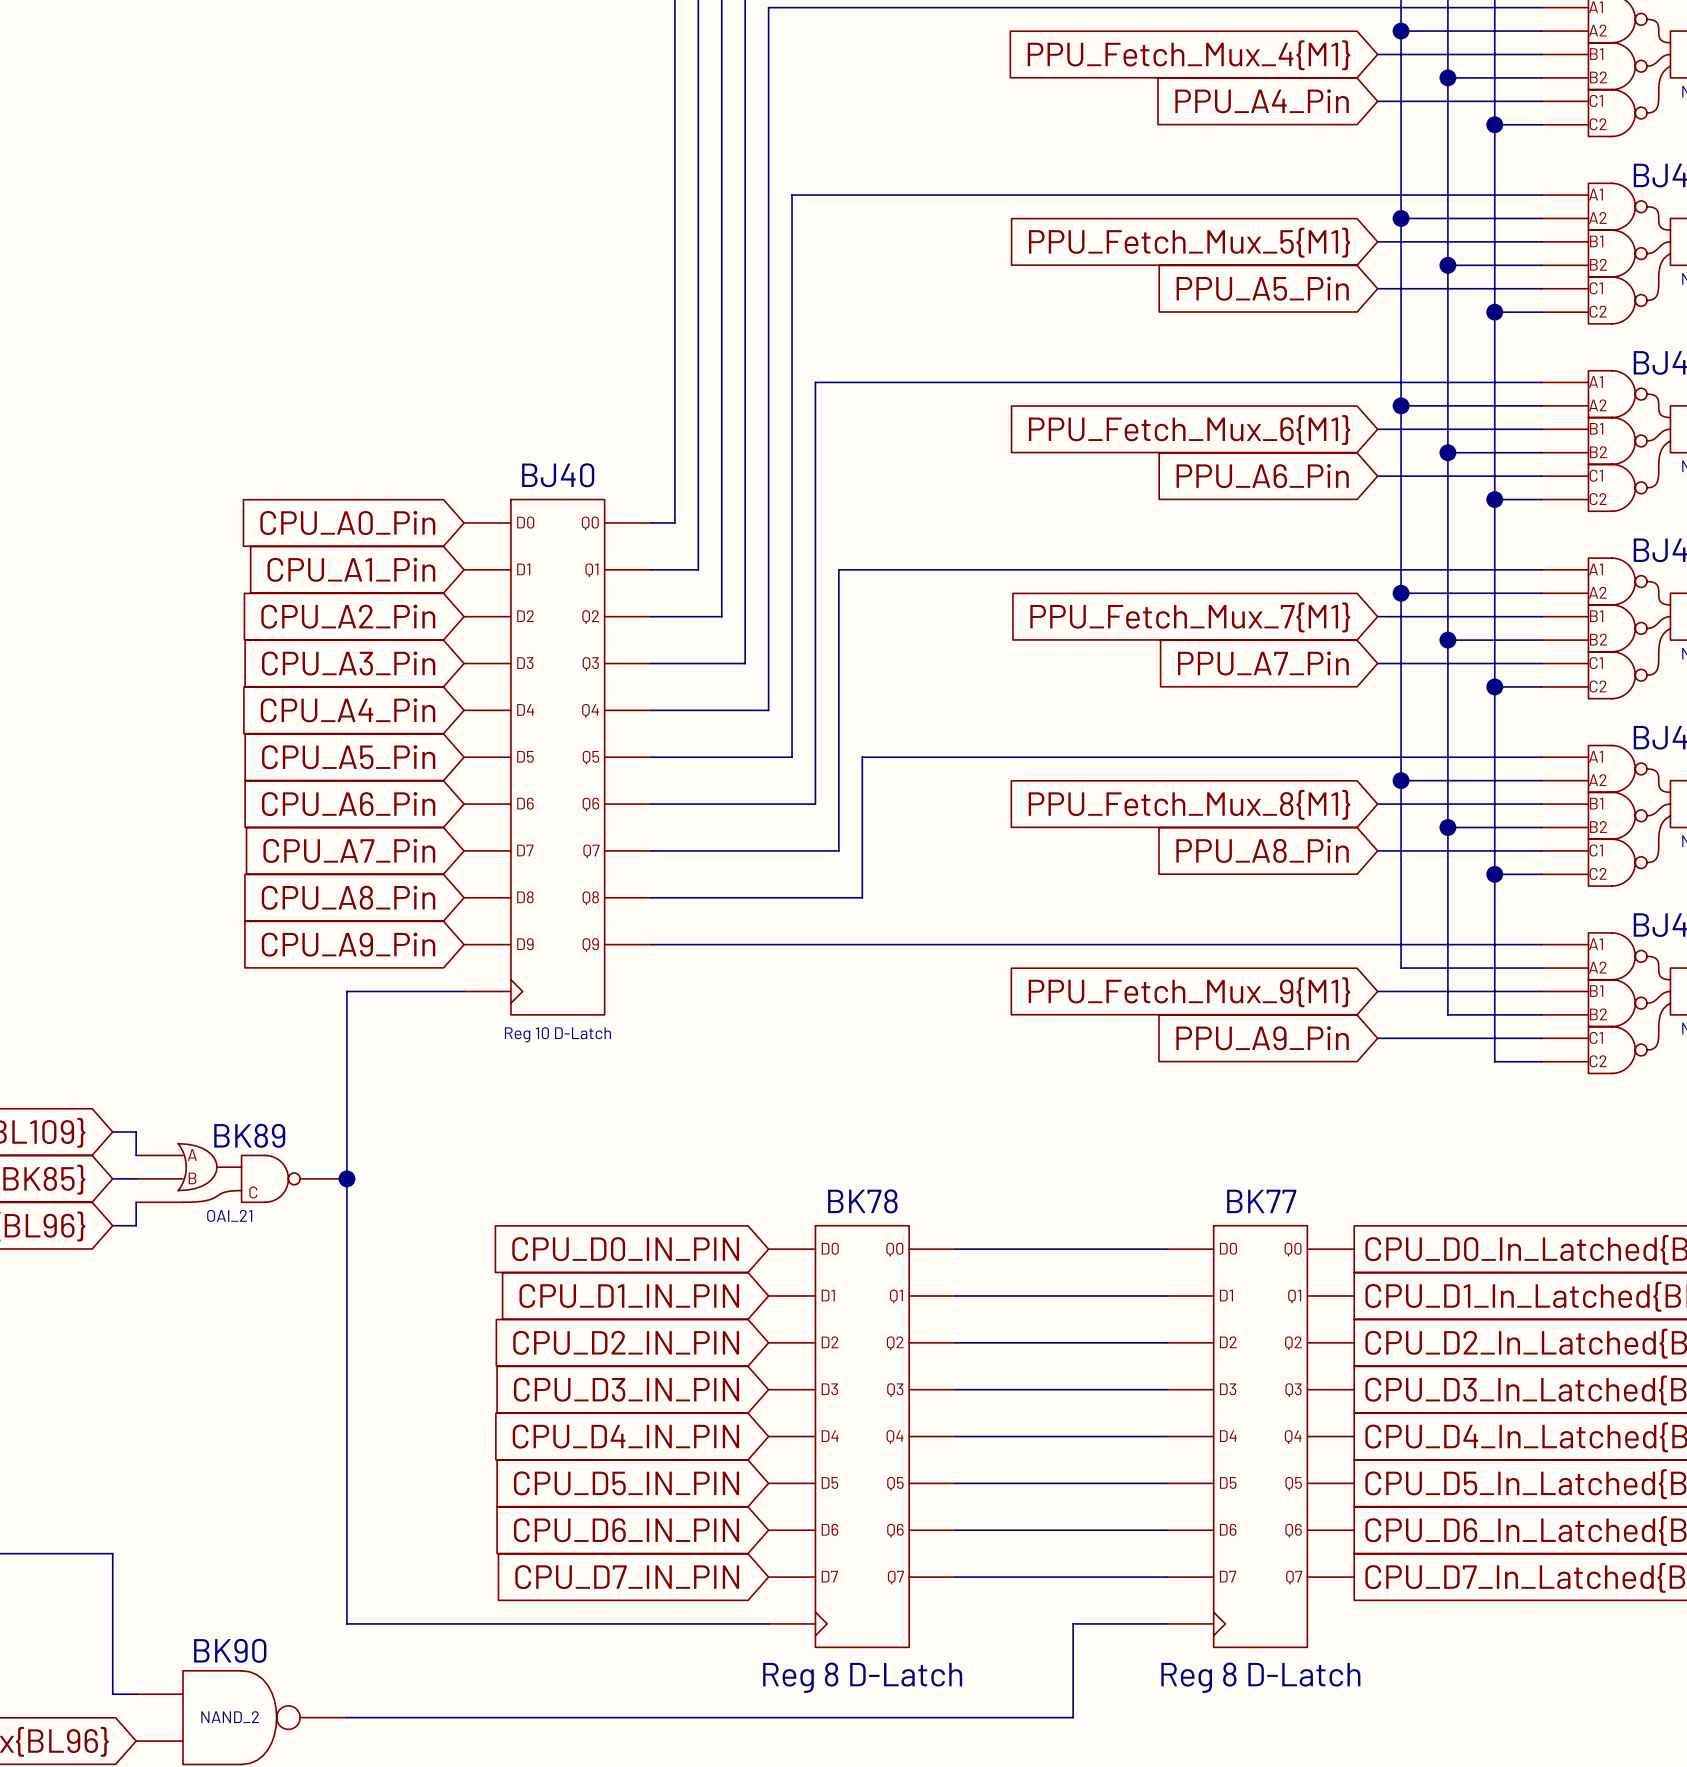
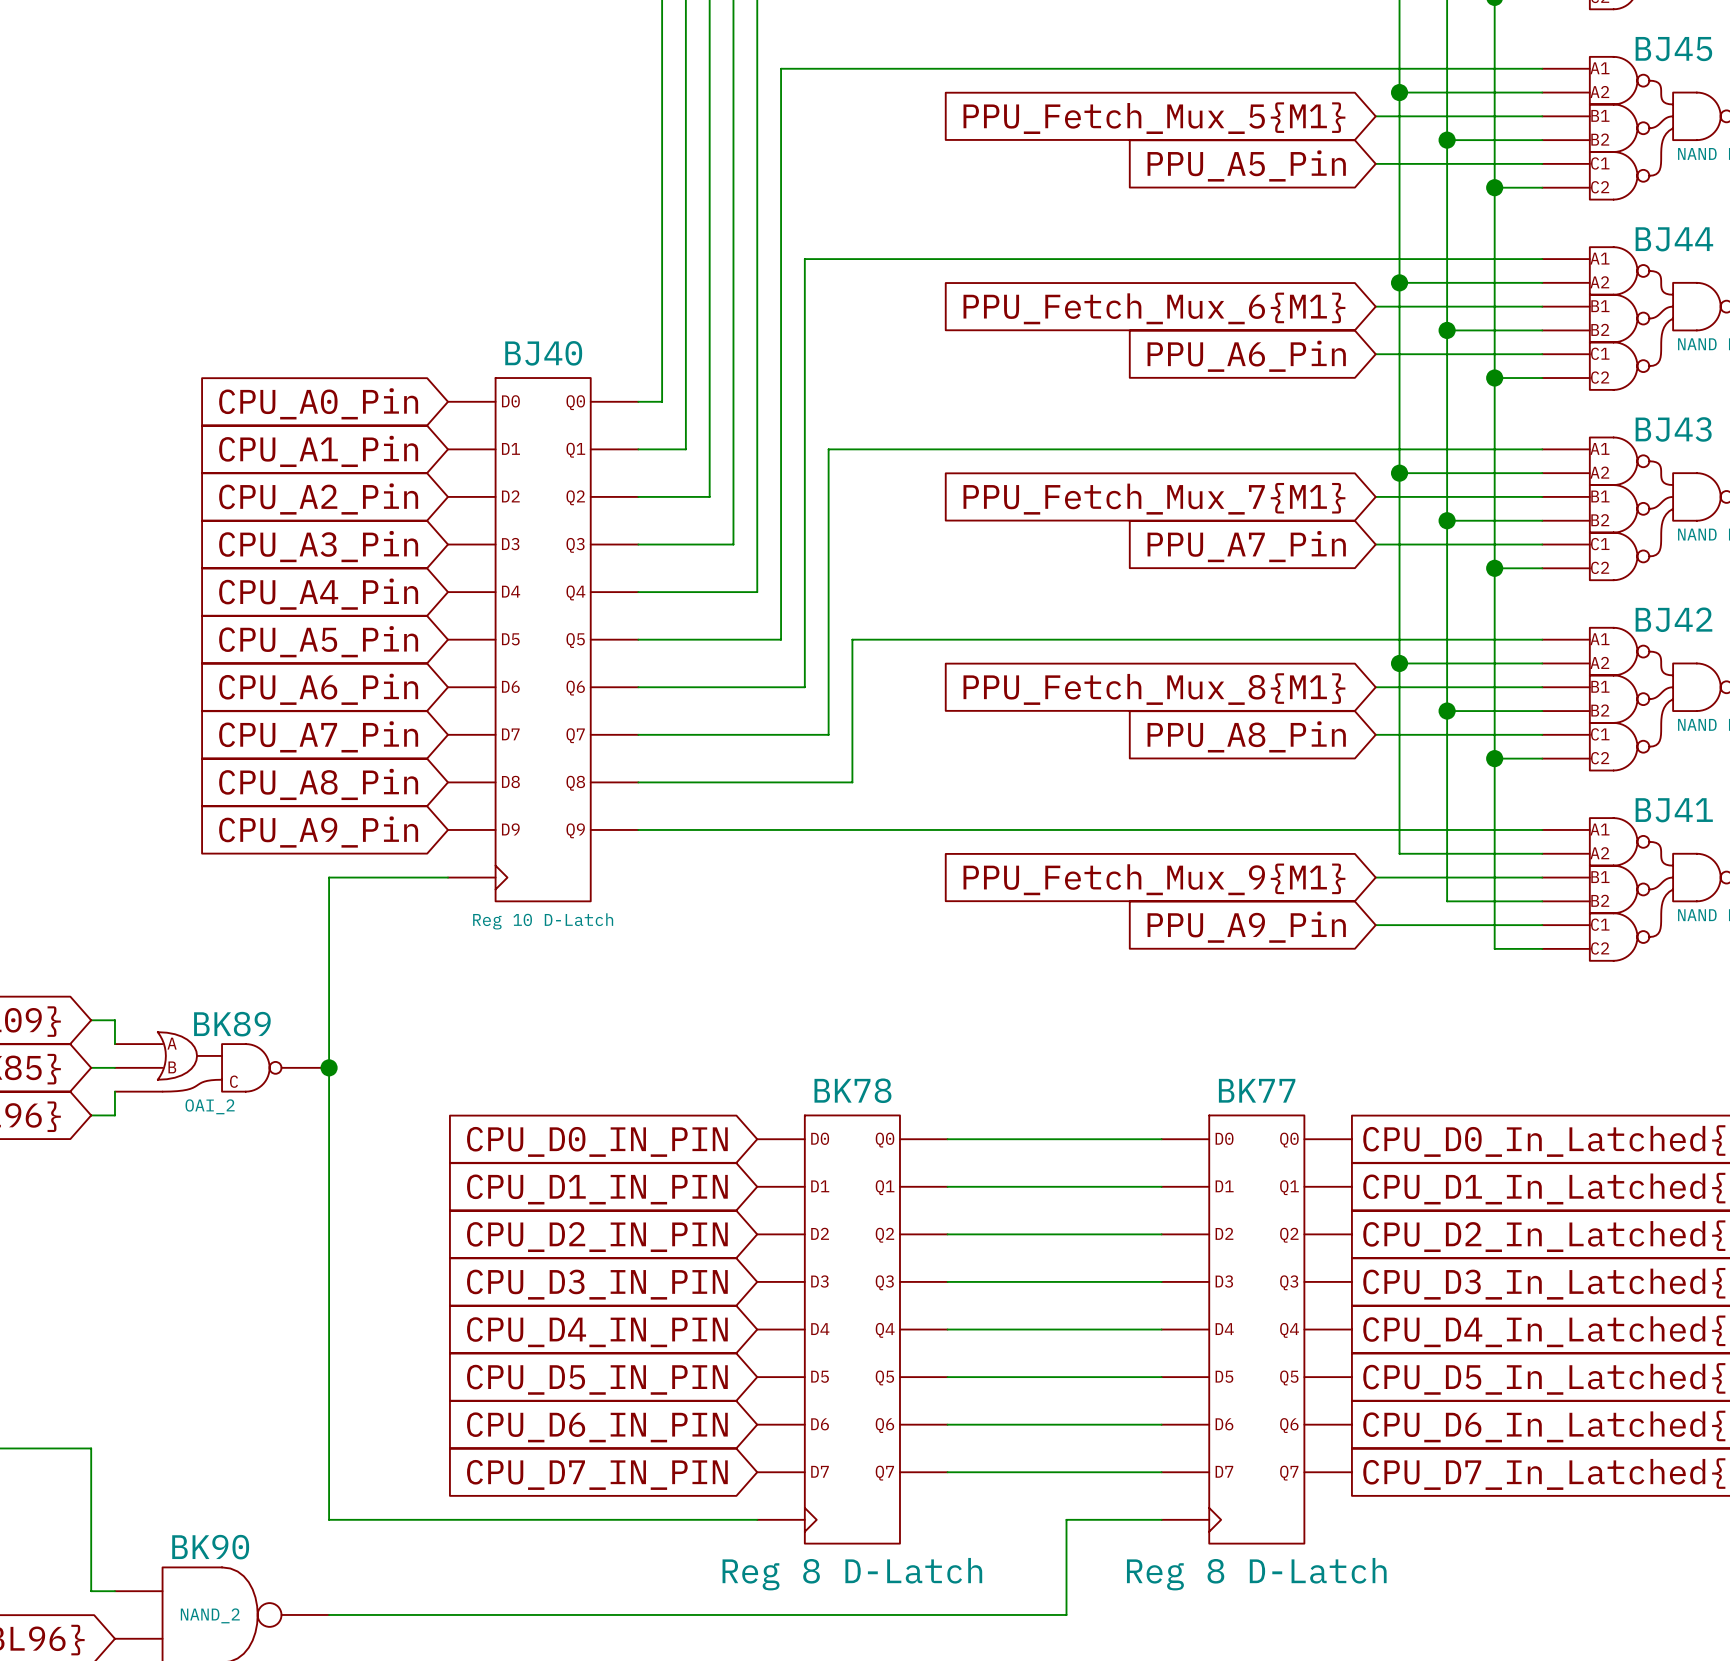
BK89 value: OAI_21 (229, 1215) -> OAI_2 (210, 1106)

